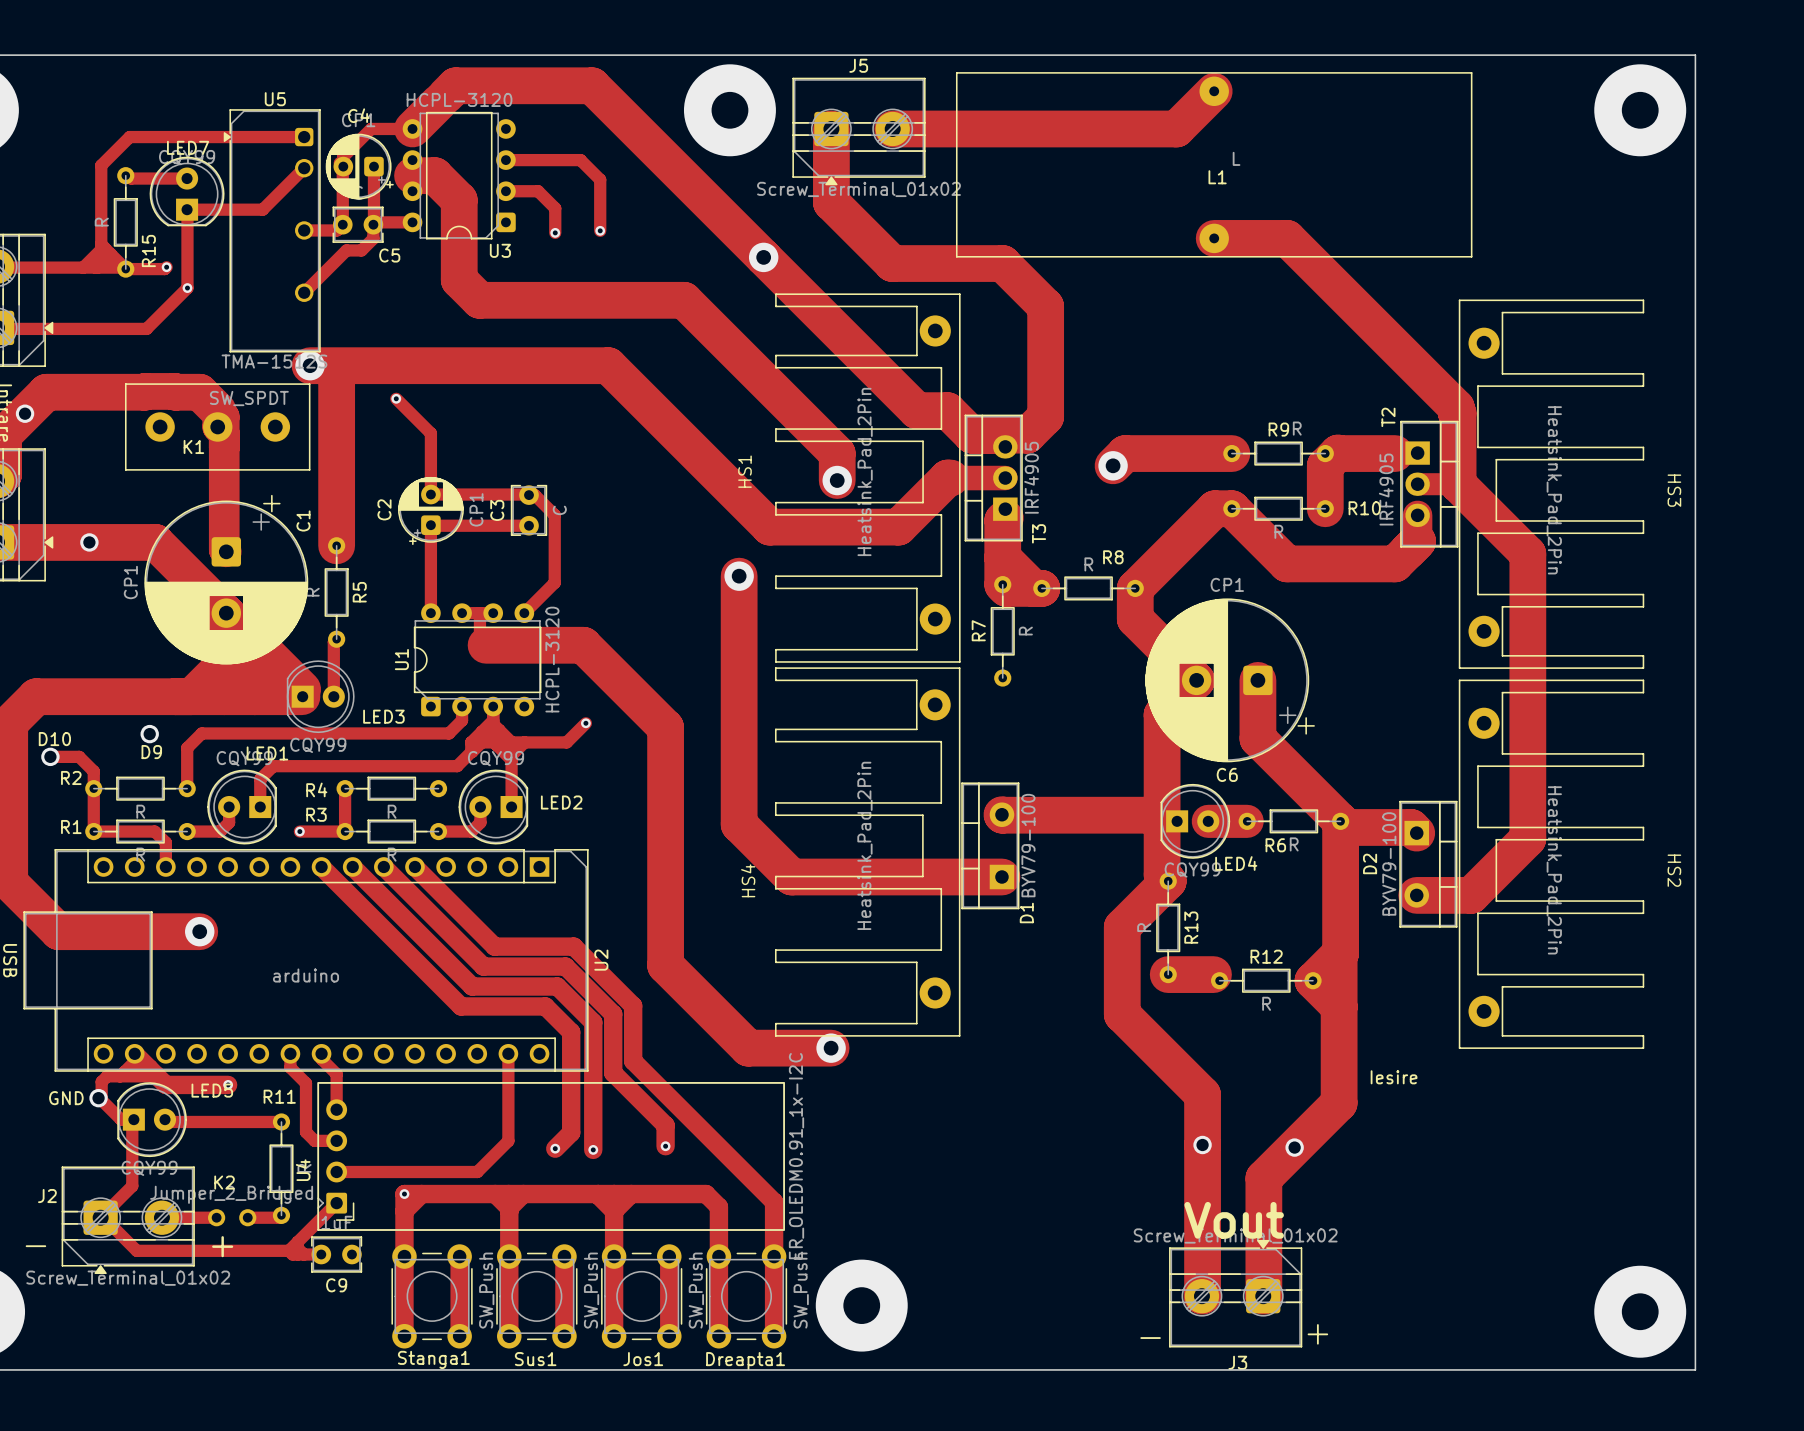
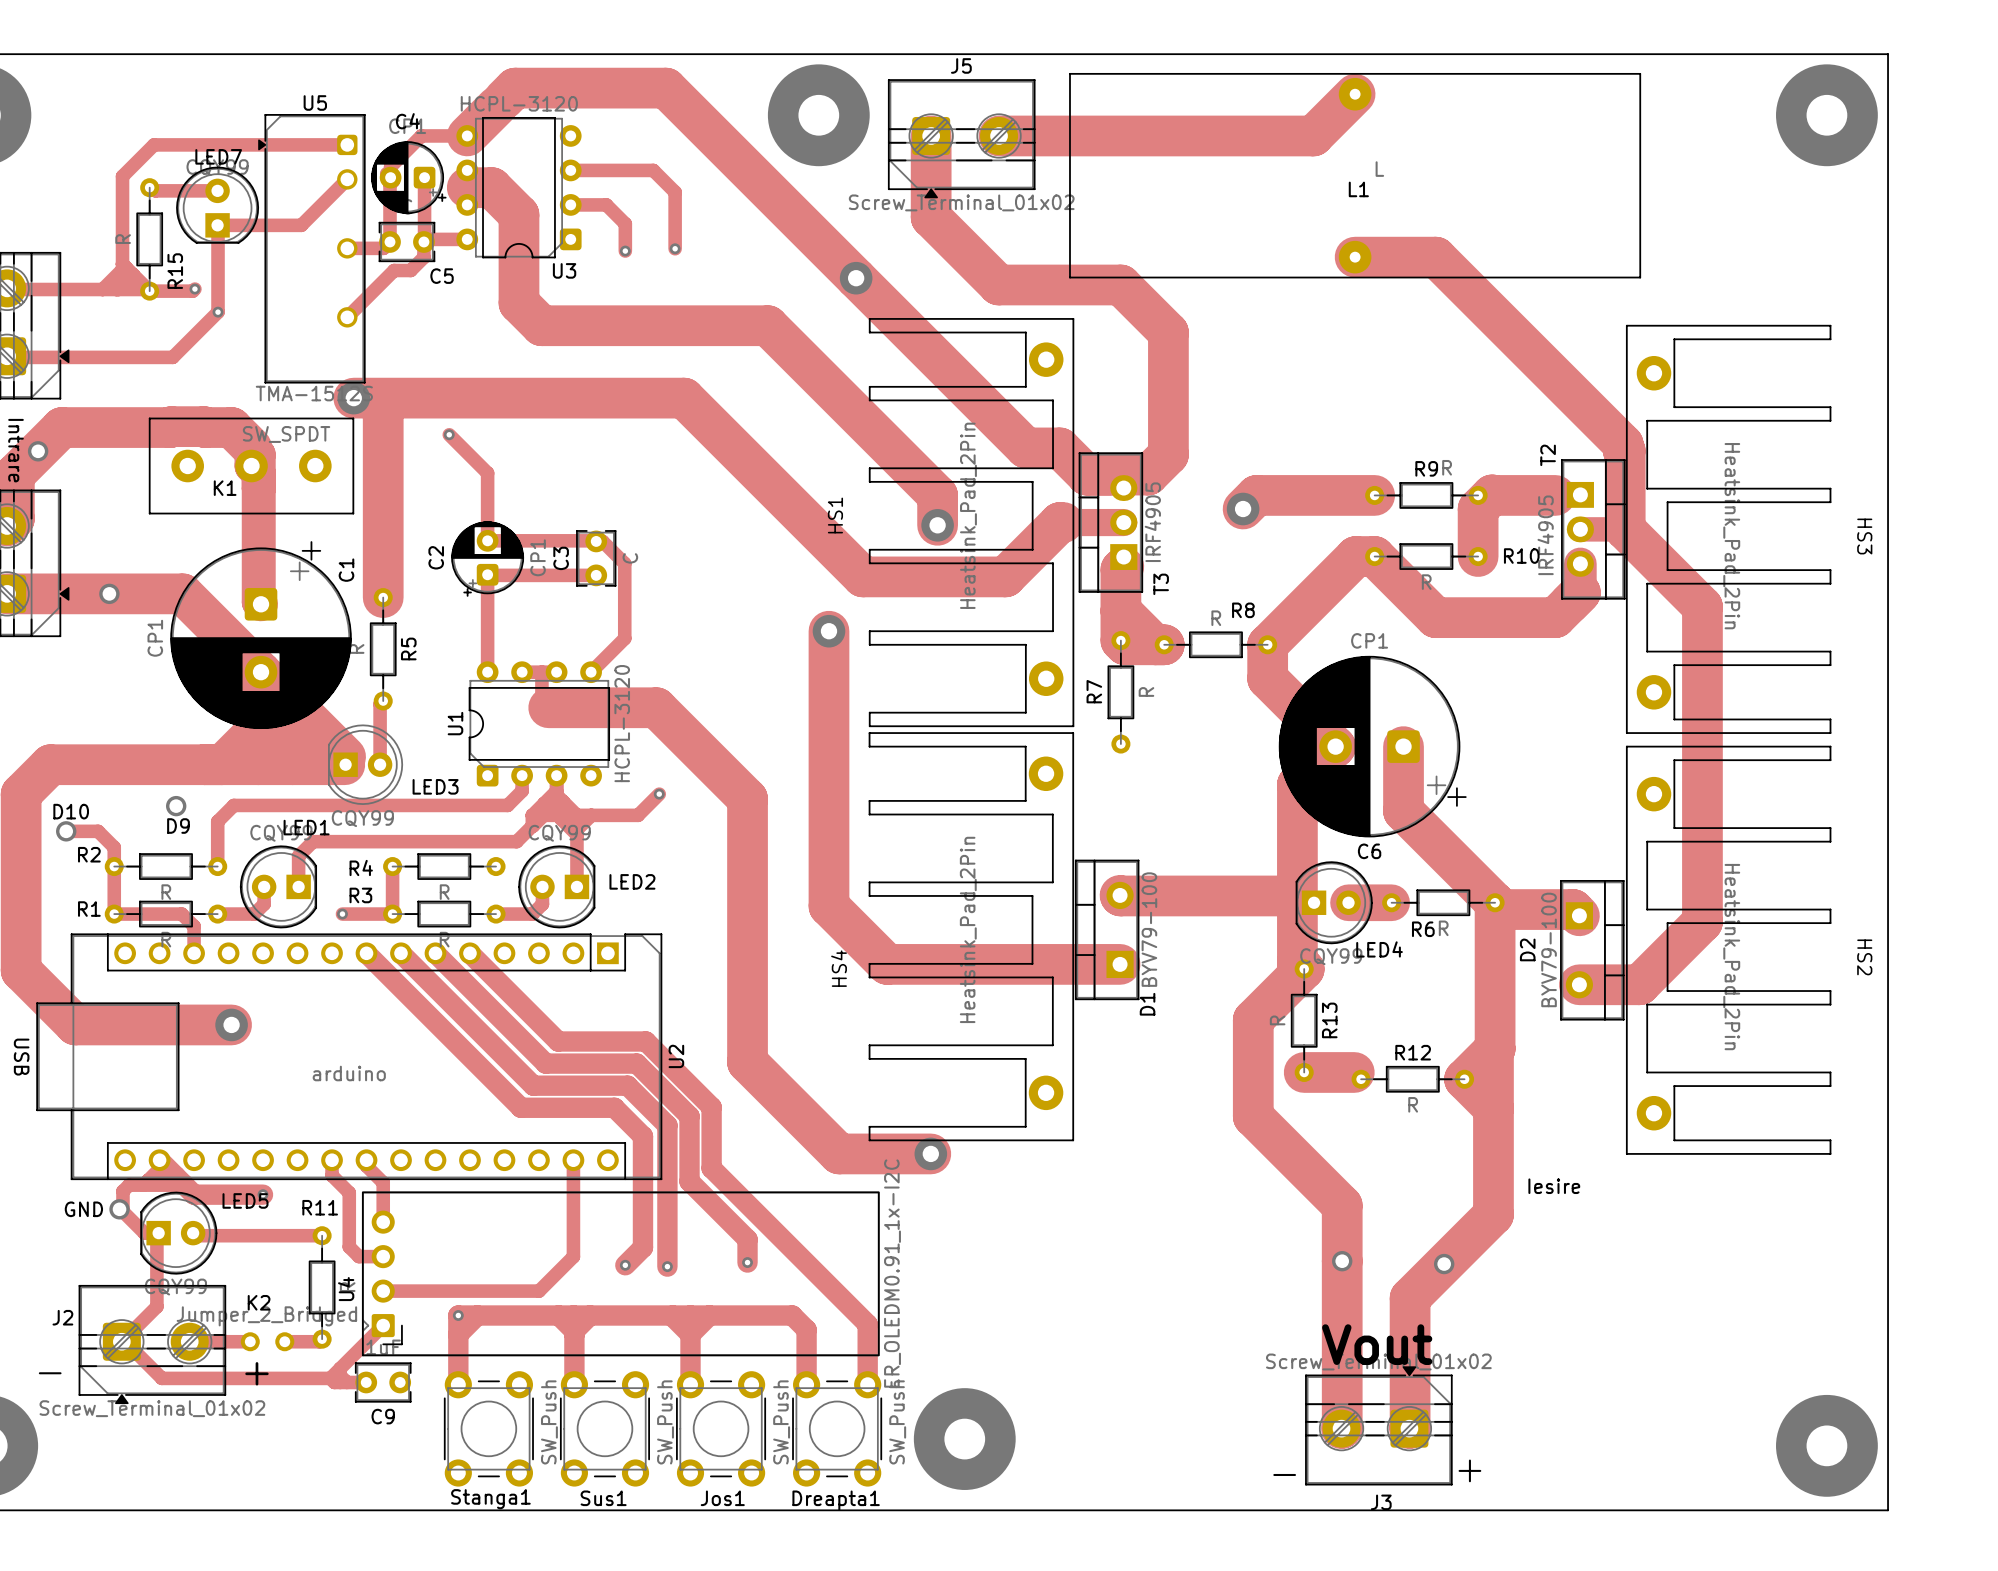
track: (404, 1256) (404, 1336) -> none
track: (459, 1256) (459, 1336) -> none
track: (509, 1256) (509, 1336) -> none
track: (564, 1256) (564, 1336) -> none
track: (614, 1256) (614, 1336) -> none
track: (669, 1256) (669, 1336) -> none
track: (718, 1256) (718, 1336) -> none
track: (774, 1256) (774, 1336) -> none

